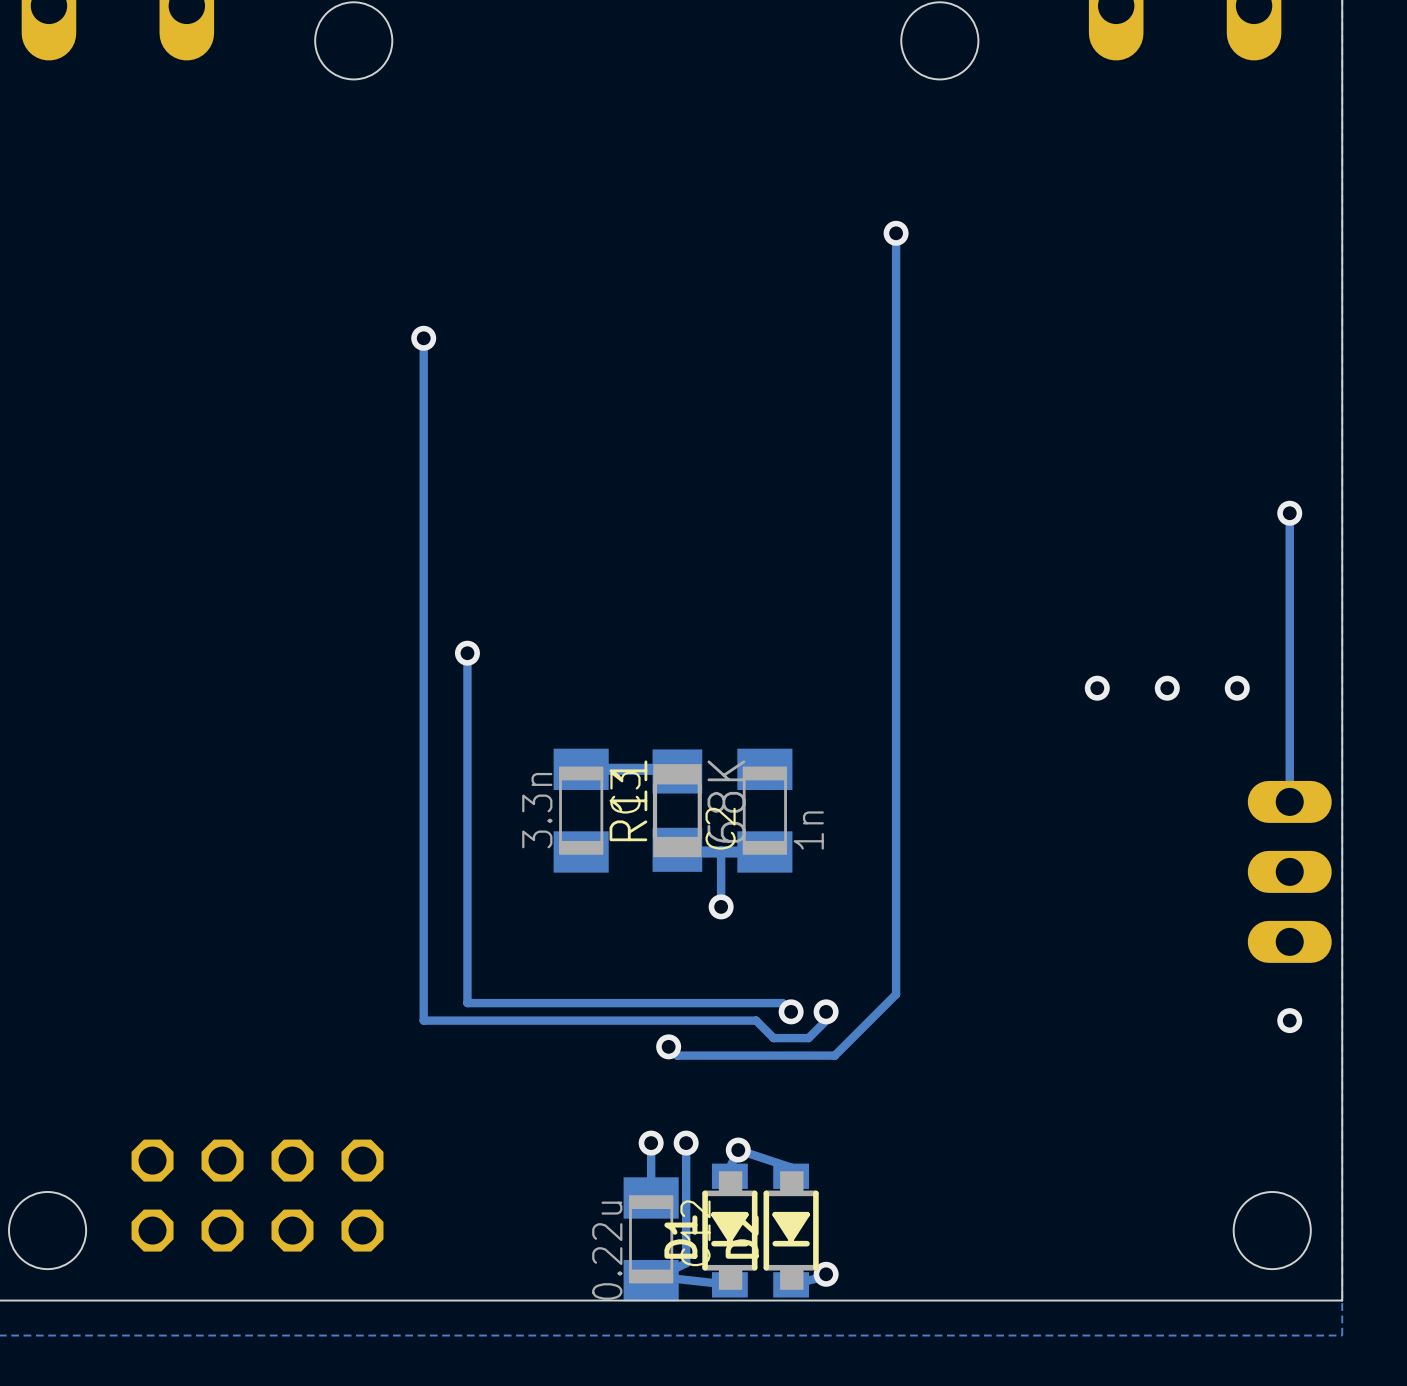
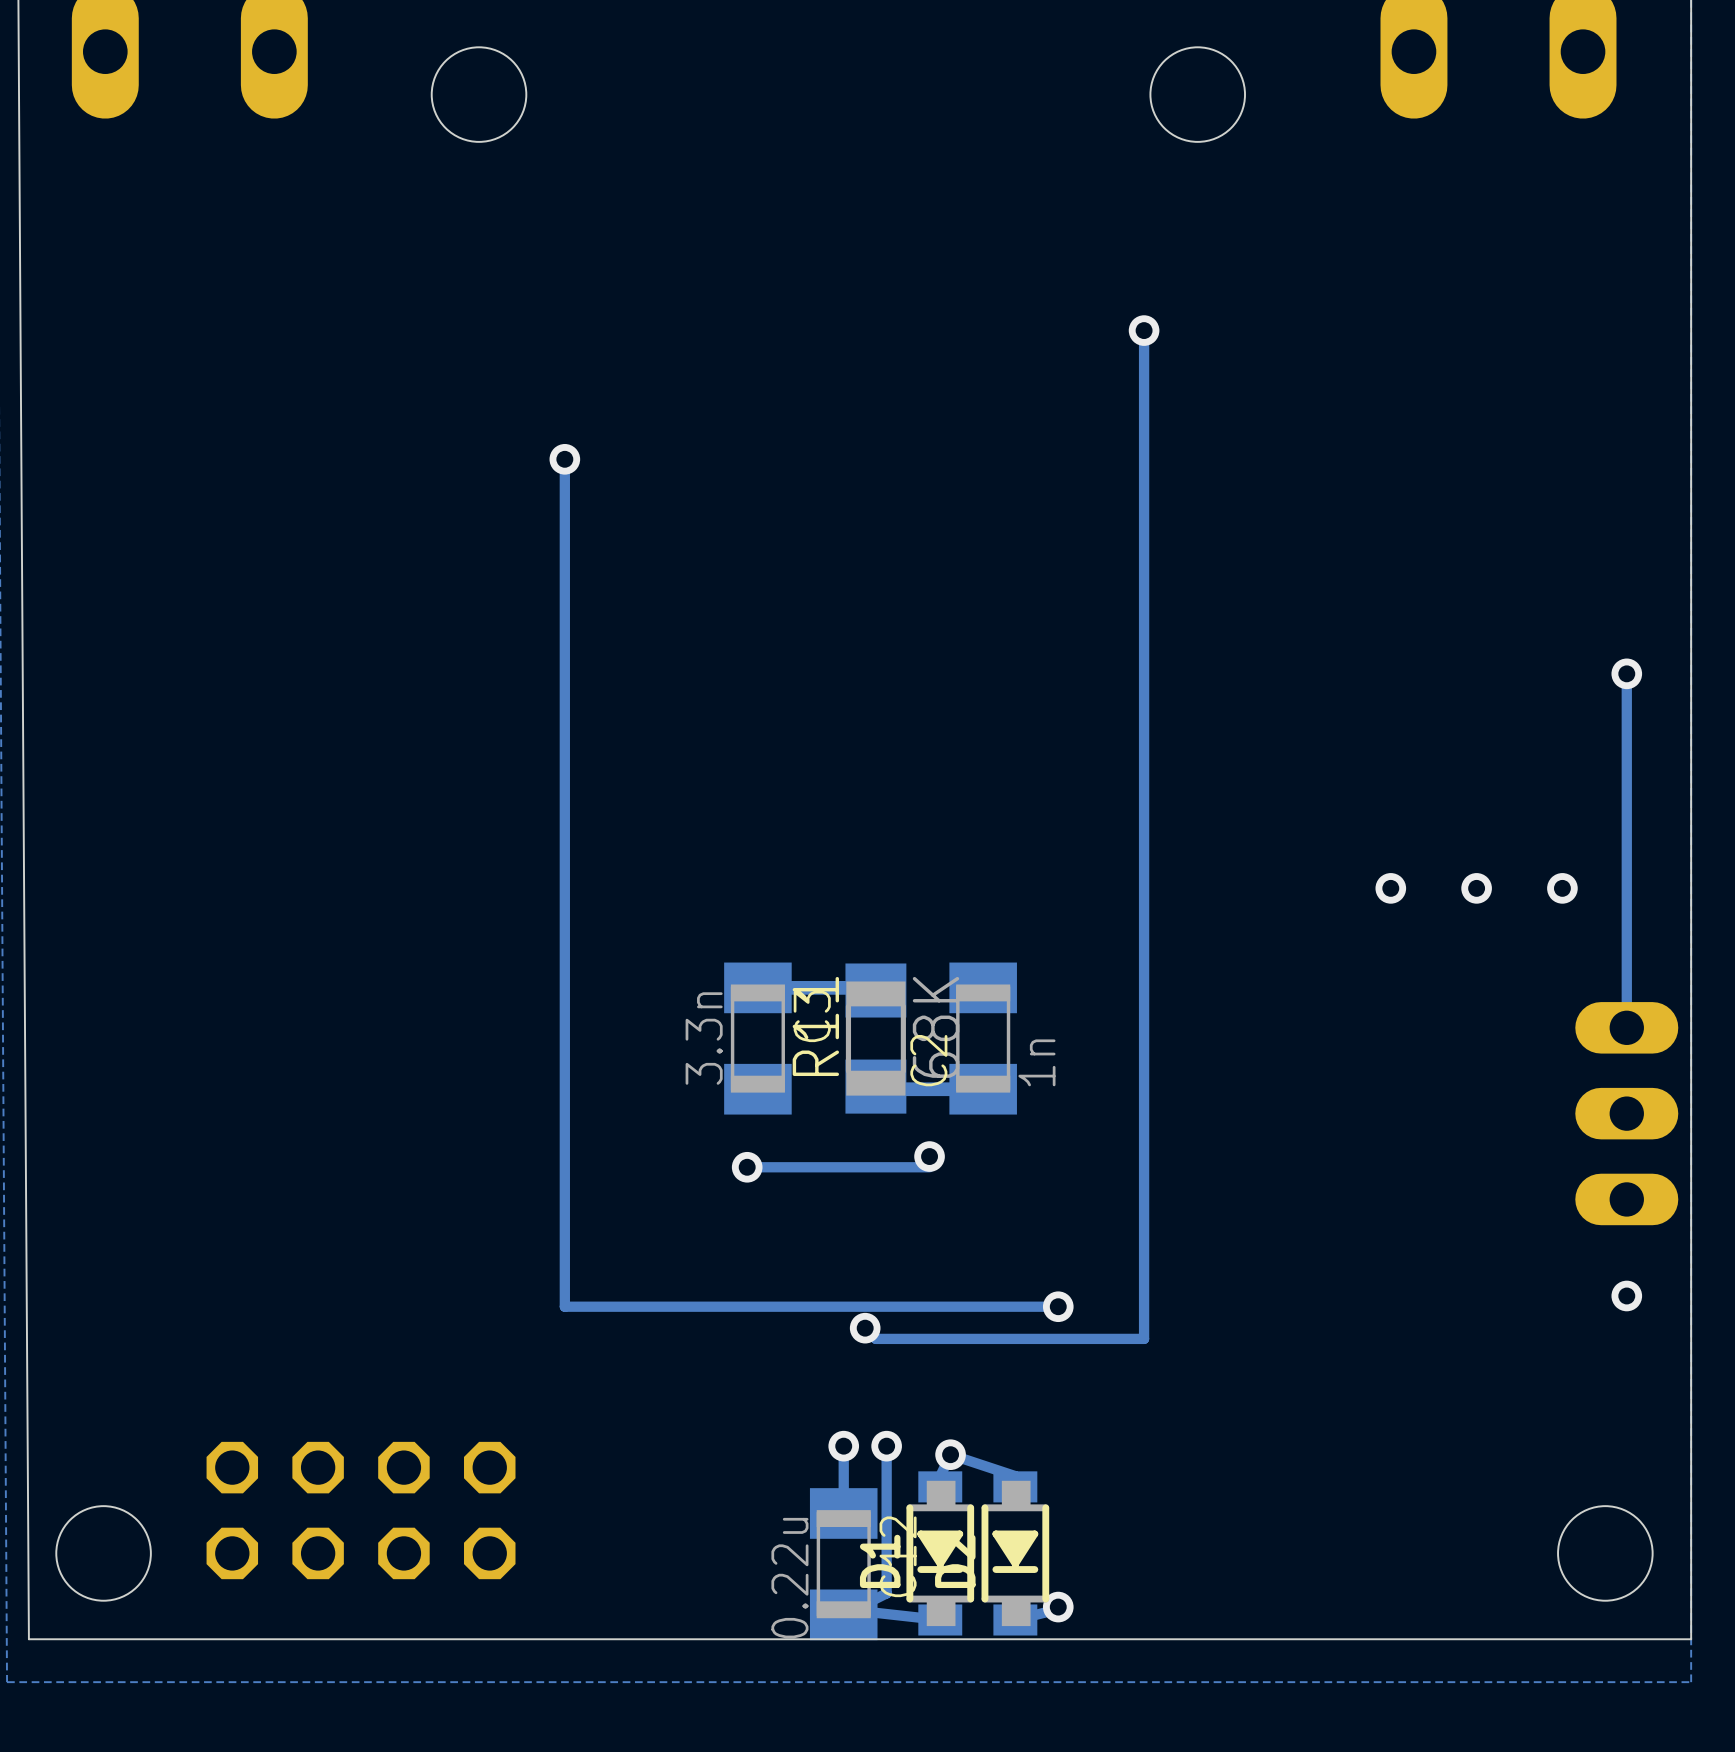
track: (467, 653) (467, 1003) (782, 1003) (791, 1011) -> none
via: (467, 653) -> none
track: (721, 851) (721, 906) -> none
via: none -> (747, 1167)
track: none -> (929, 1167) (747, 1167)
track: (896, 994) (834, 1055) -> (1144, 1263) (1144, 1338) (1068, 1338)
via: (791, 1011) -> none
track: (826, 1011) (826, 1020) (808, 1038) (773, 1038) (756, 1020) (423, 1020) -> (1058, 1306) (564, 1306) (564, 1295)
via position: (826, 1011) -> (1058, 1306)

